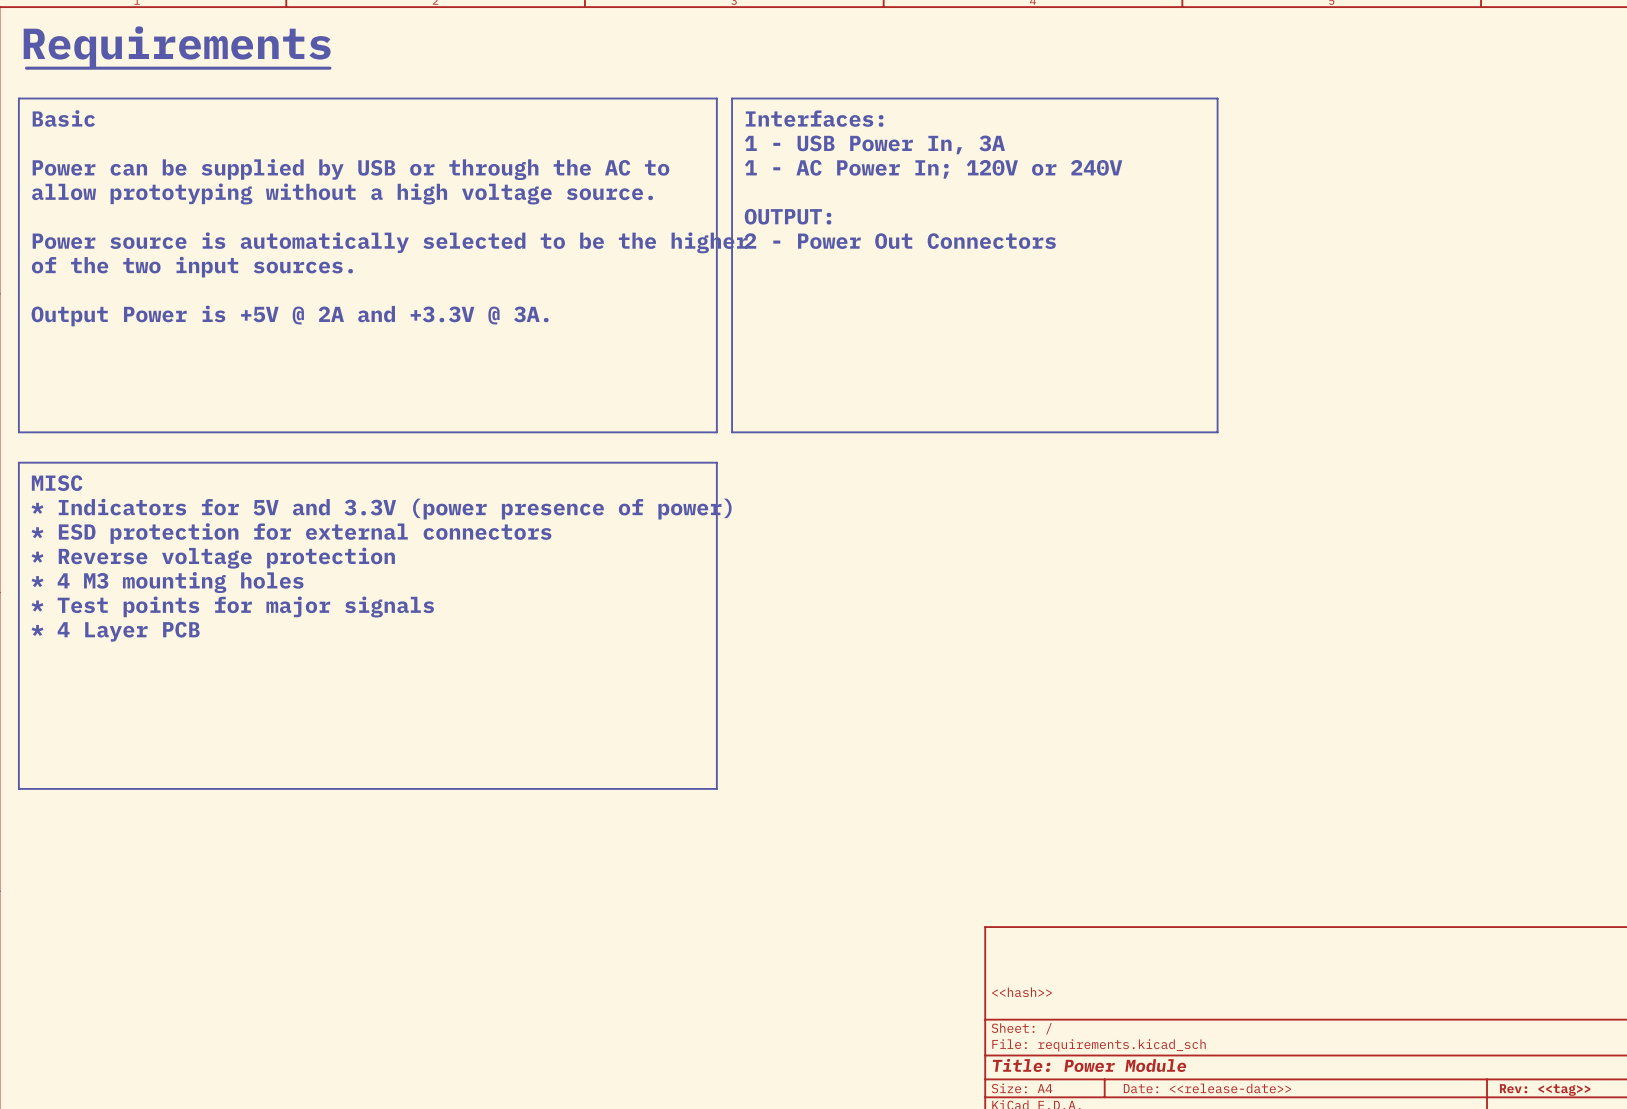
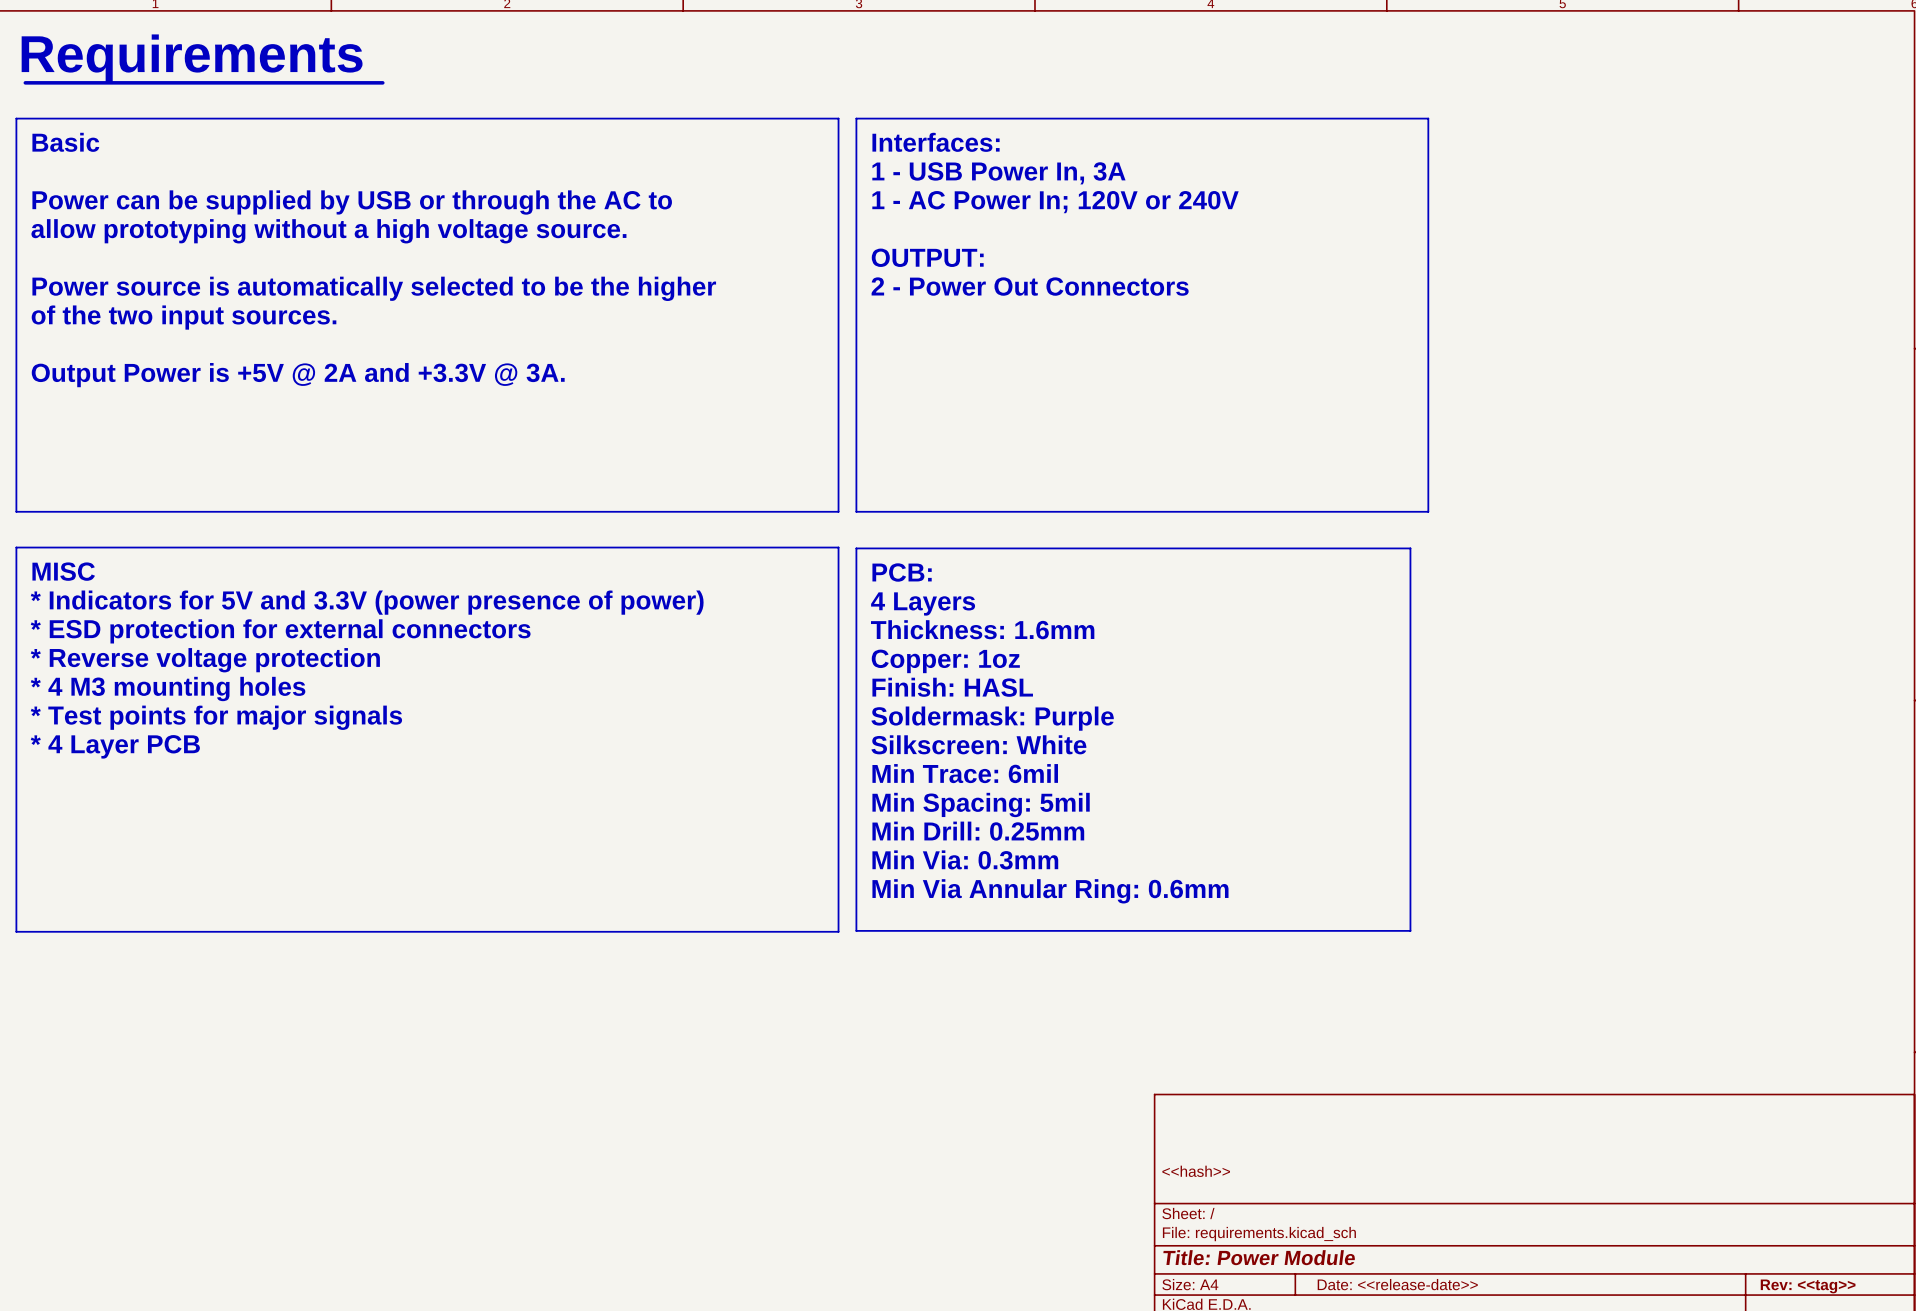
line: none -> (856, 548) (1410, 548) (1410, 930) (856, 930) (856, 548)
text: none -> PCB: (902, 572)
text: none -> 4 Layers (923, 603)
text: none -> Thickness: 1.6mm (982, 629)
text: none -> Copper: 1oz (945, 661)
text: none -> Finish: HASL (952, 687)
text: none -> Soldermask: Purple (992, 718)
text: none -> Silkscreen: White (978, 744)
text: none -> Min Trace: 6mil (965, 773)
text: none -> Min Spacing: 5mil (981, 804)
text: none -> Min Drill: 0.25mm (978, 831)
text: none -> Min Via: 0.3mm (965, 859)
text: none -> Min Via Annular Ring: 0.6mm (1050, 891)

